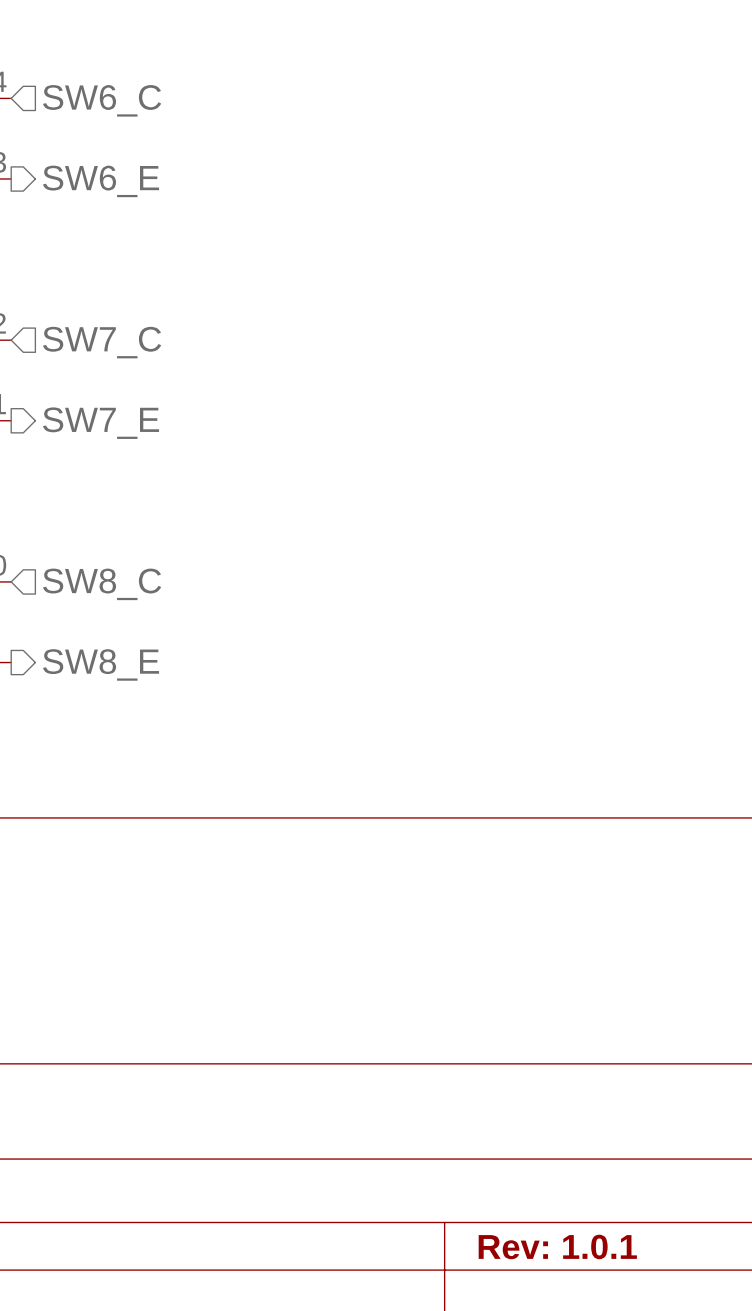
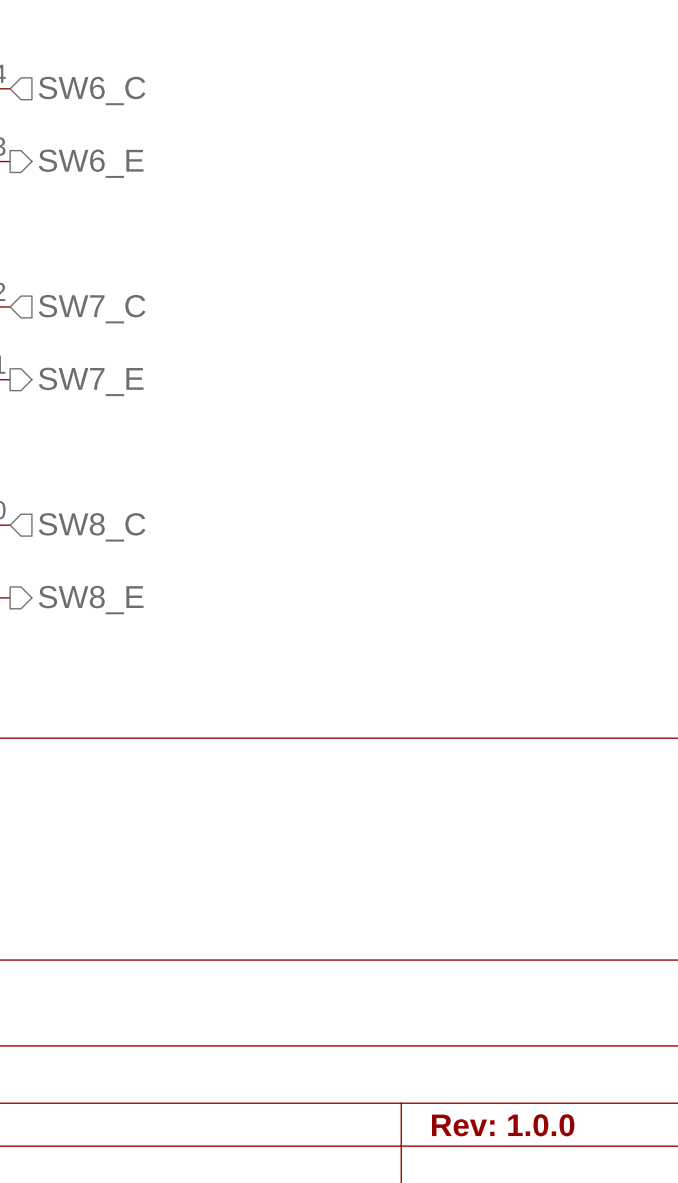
title block: Rev: 1.0.1 (557, 1246) -> Rev: 1.0.0 (503, 1125)

